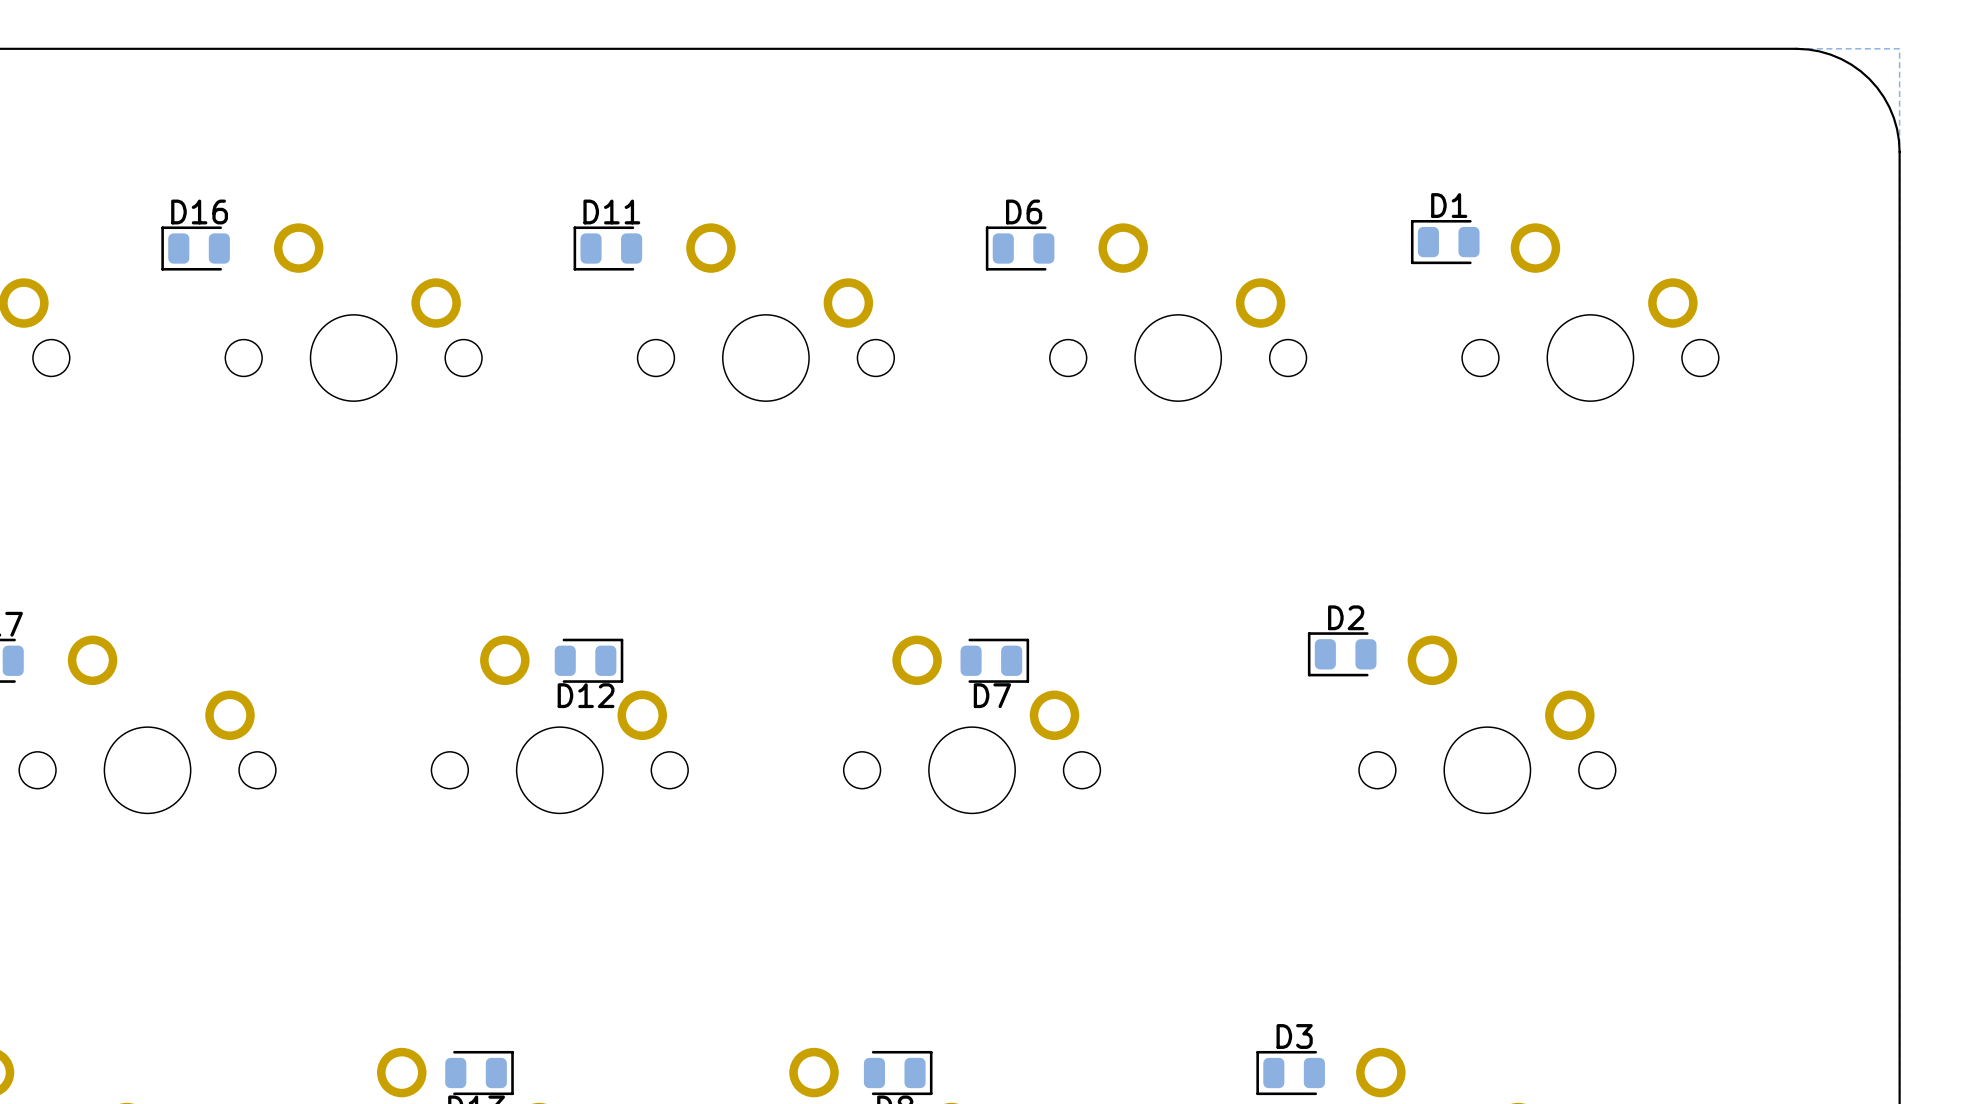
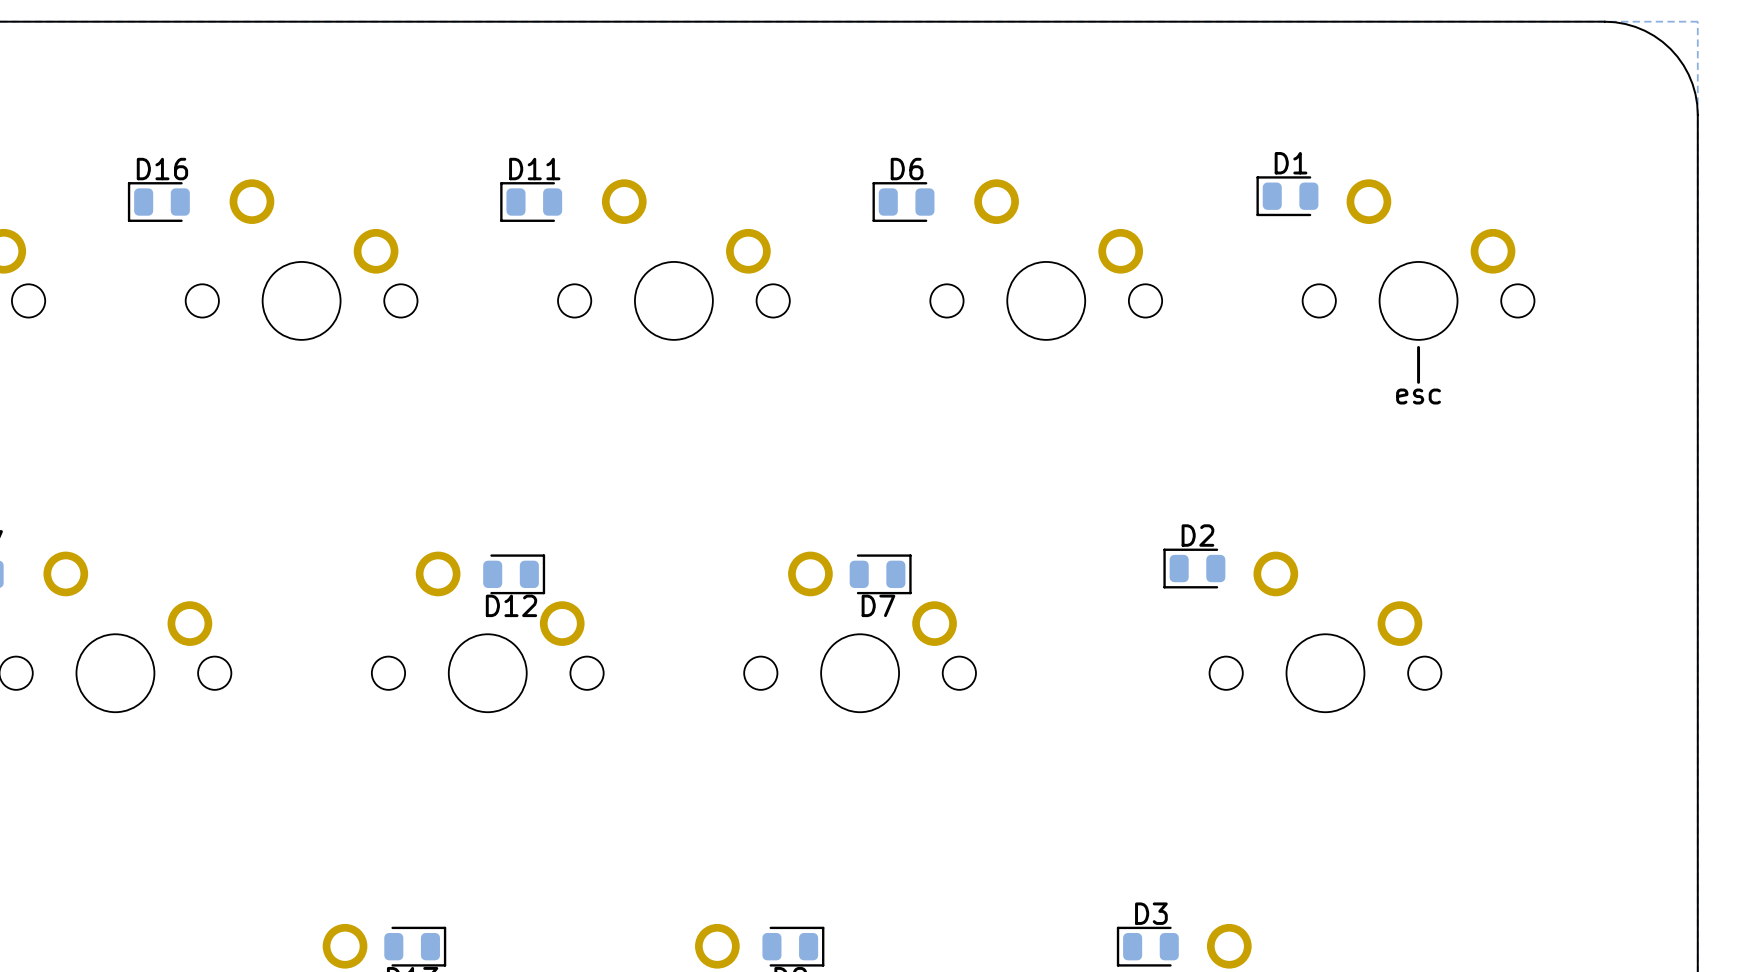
line: none -> (1418, 347) (1418, 382)
text: none -> esc (1418, 396)

